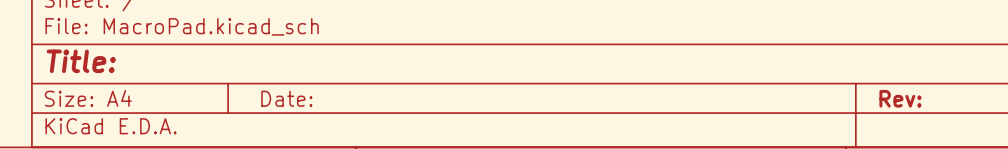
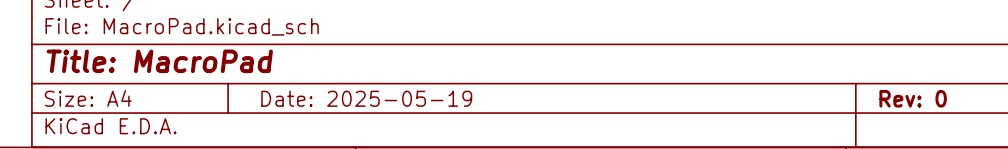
title block: Title: (81, 61) -> Title: MacroPad (159, 61)
title block: Date: (286, 98) -> Date: 2025-05-19 (366, 98)
title block: Rev: (900, 98) -> Rev: 0 (913, 98)

